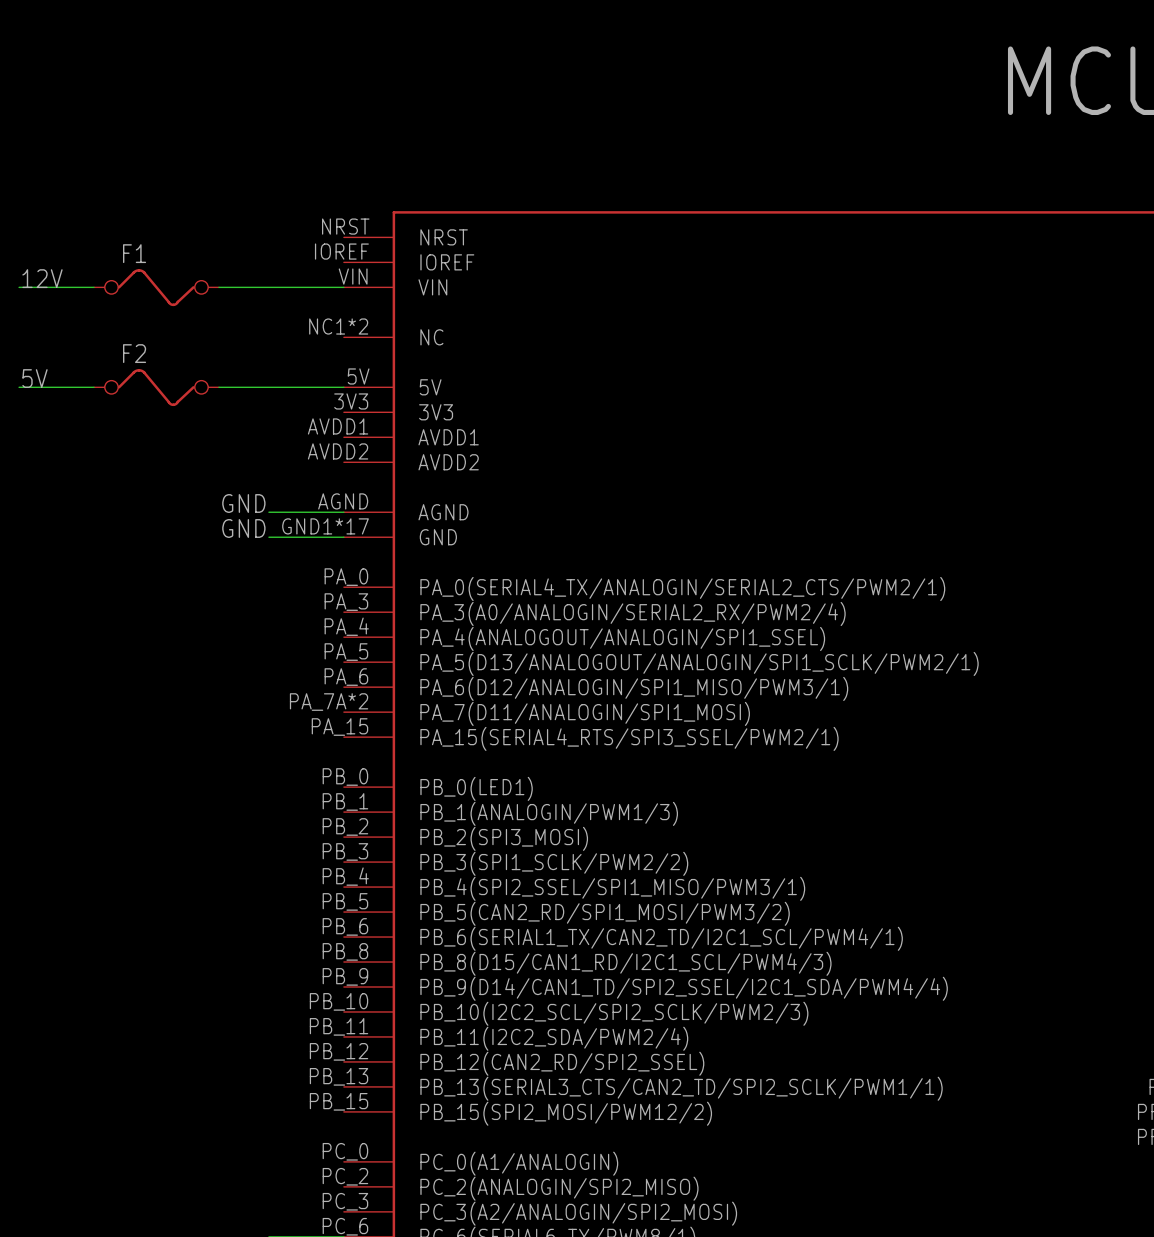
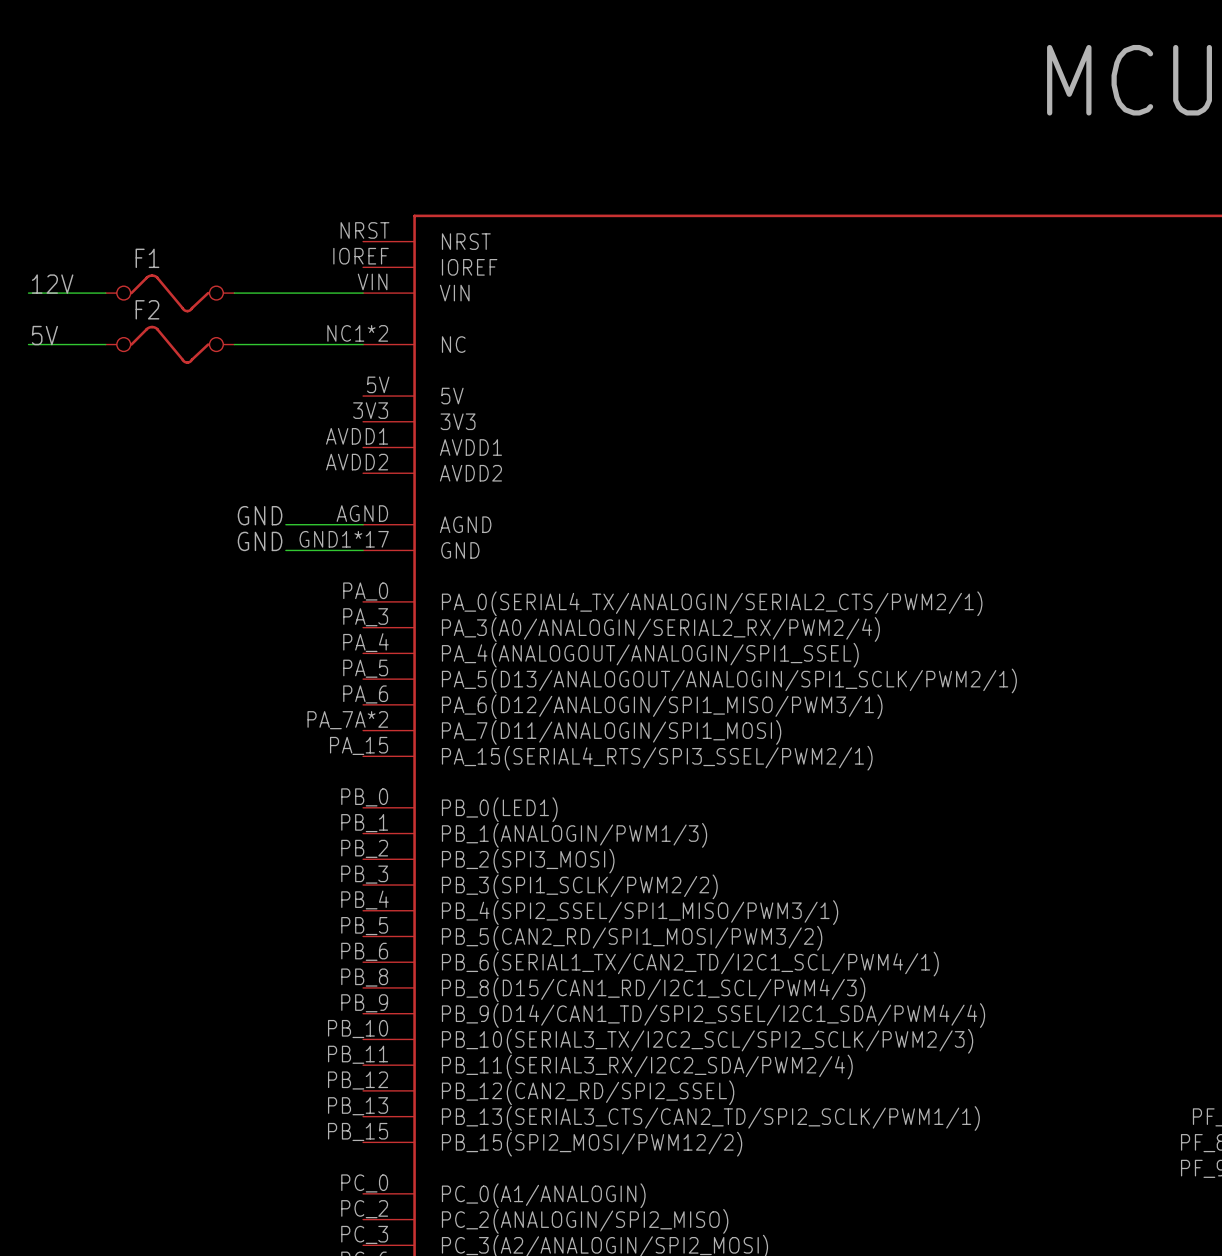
label position: 5V (34, 378) -> 5V (44, 335)
wire: (19, 387) (94, 387) -> (28, 344) (105, 344)
F2 position: (156, 387) -> (170, 344)
wire: (218, 387) (343, 387) -> (234, 344) (363, 344)
part pin name: PB_10(I2C2_SCL/SPI2_SCLK/PWM2/3) (614, 1013) -> PB_10(SERIAL3_TX/I2C2_SCL/SPI2_SCLK/PWM2/3) (707, 1041)
part pin name: PB_11(I2C2_SDA/PWM2/4) (554, 1038) -> PB_11(SERIAL3_RX/I2C2_SDA/PWM2/4) (647, 1067)

